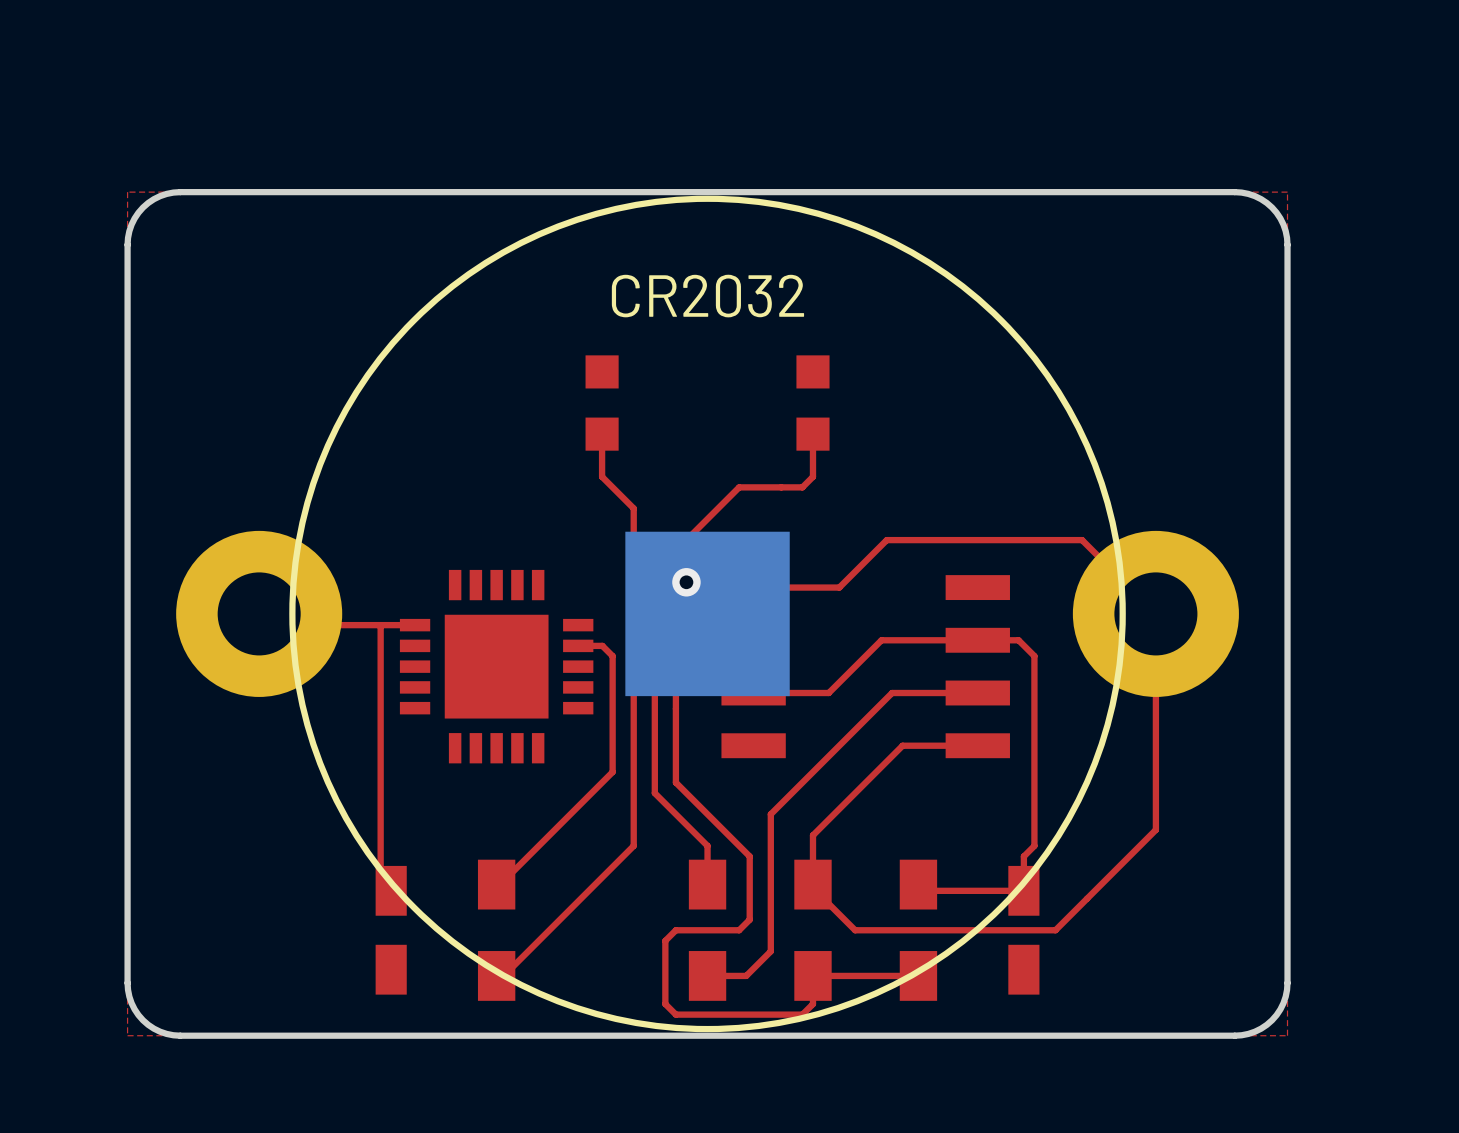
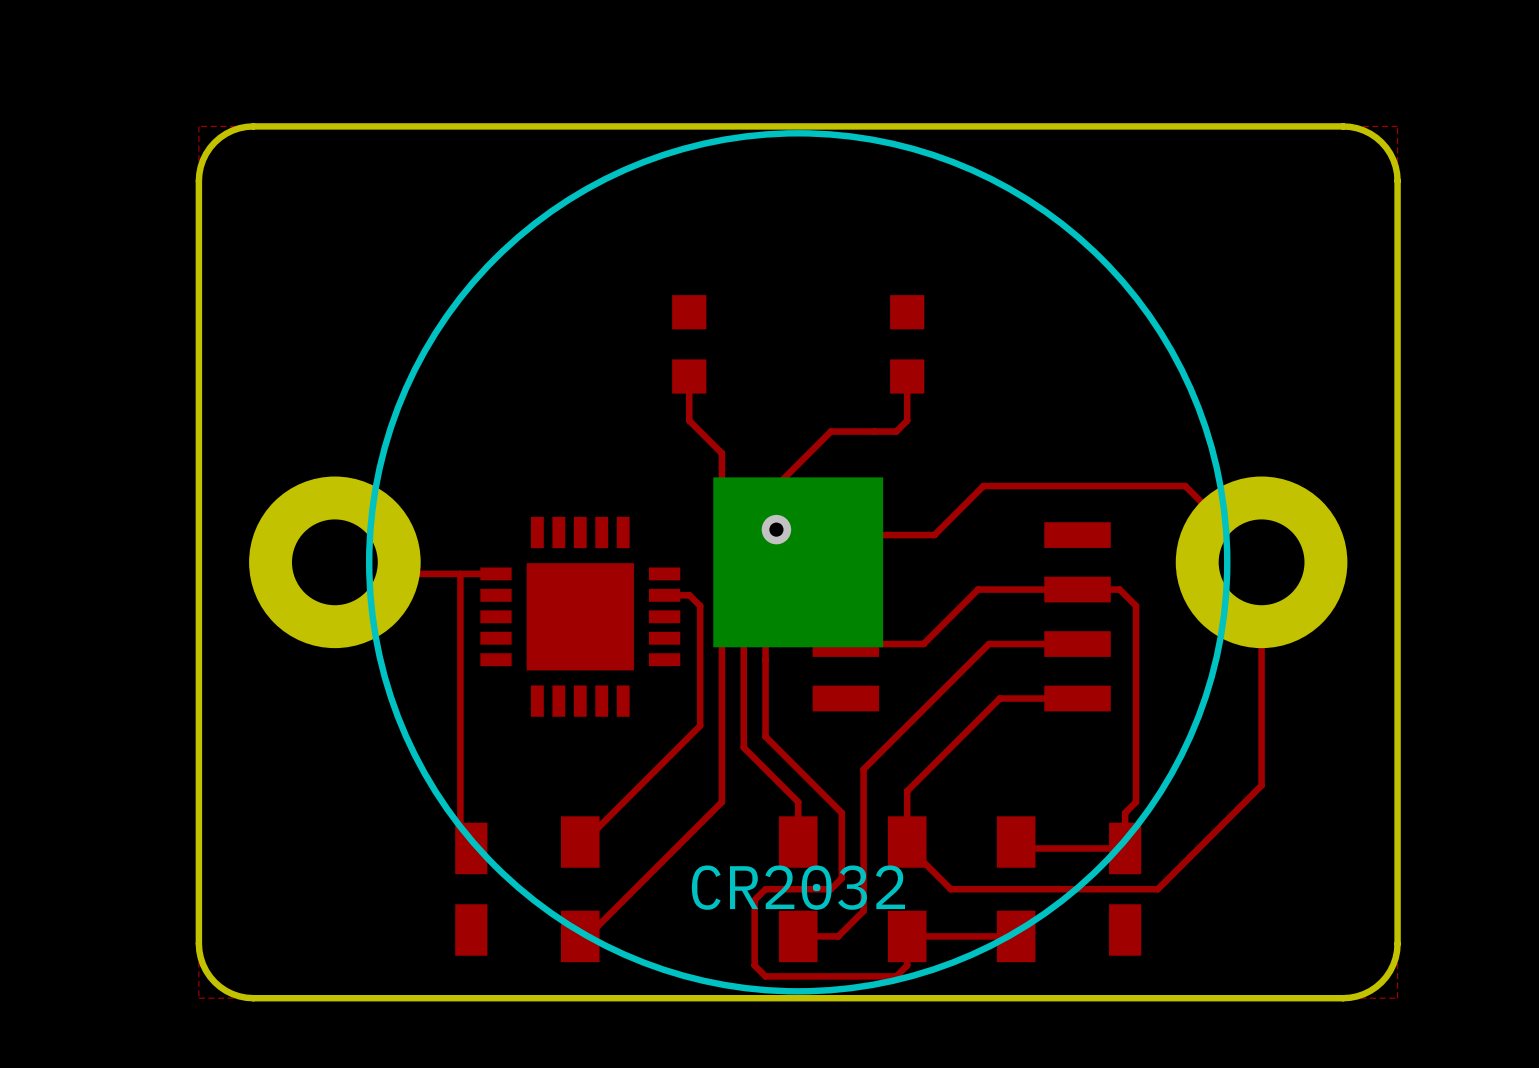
part value position: CR2032 (707, 296) -> CR2032 (798, 887)

